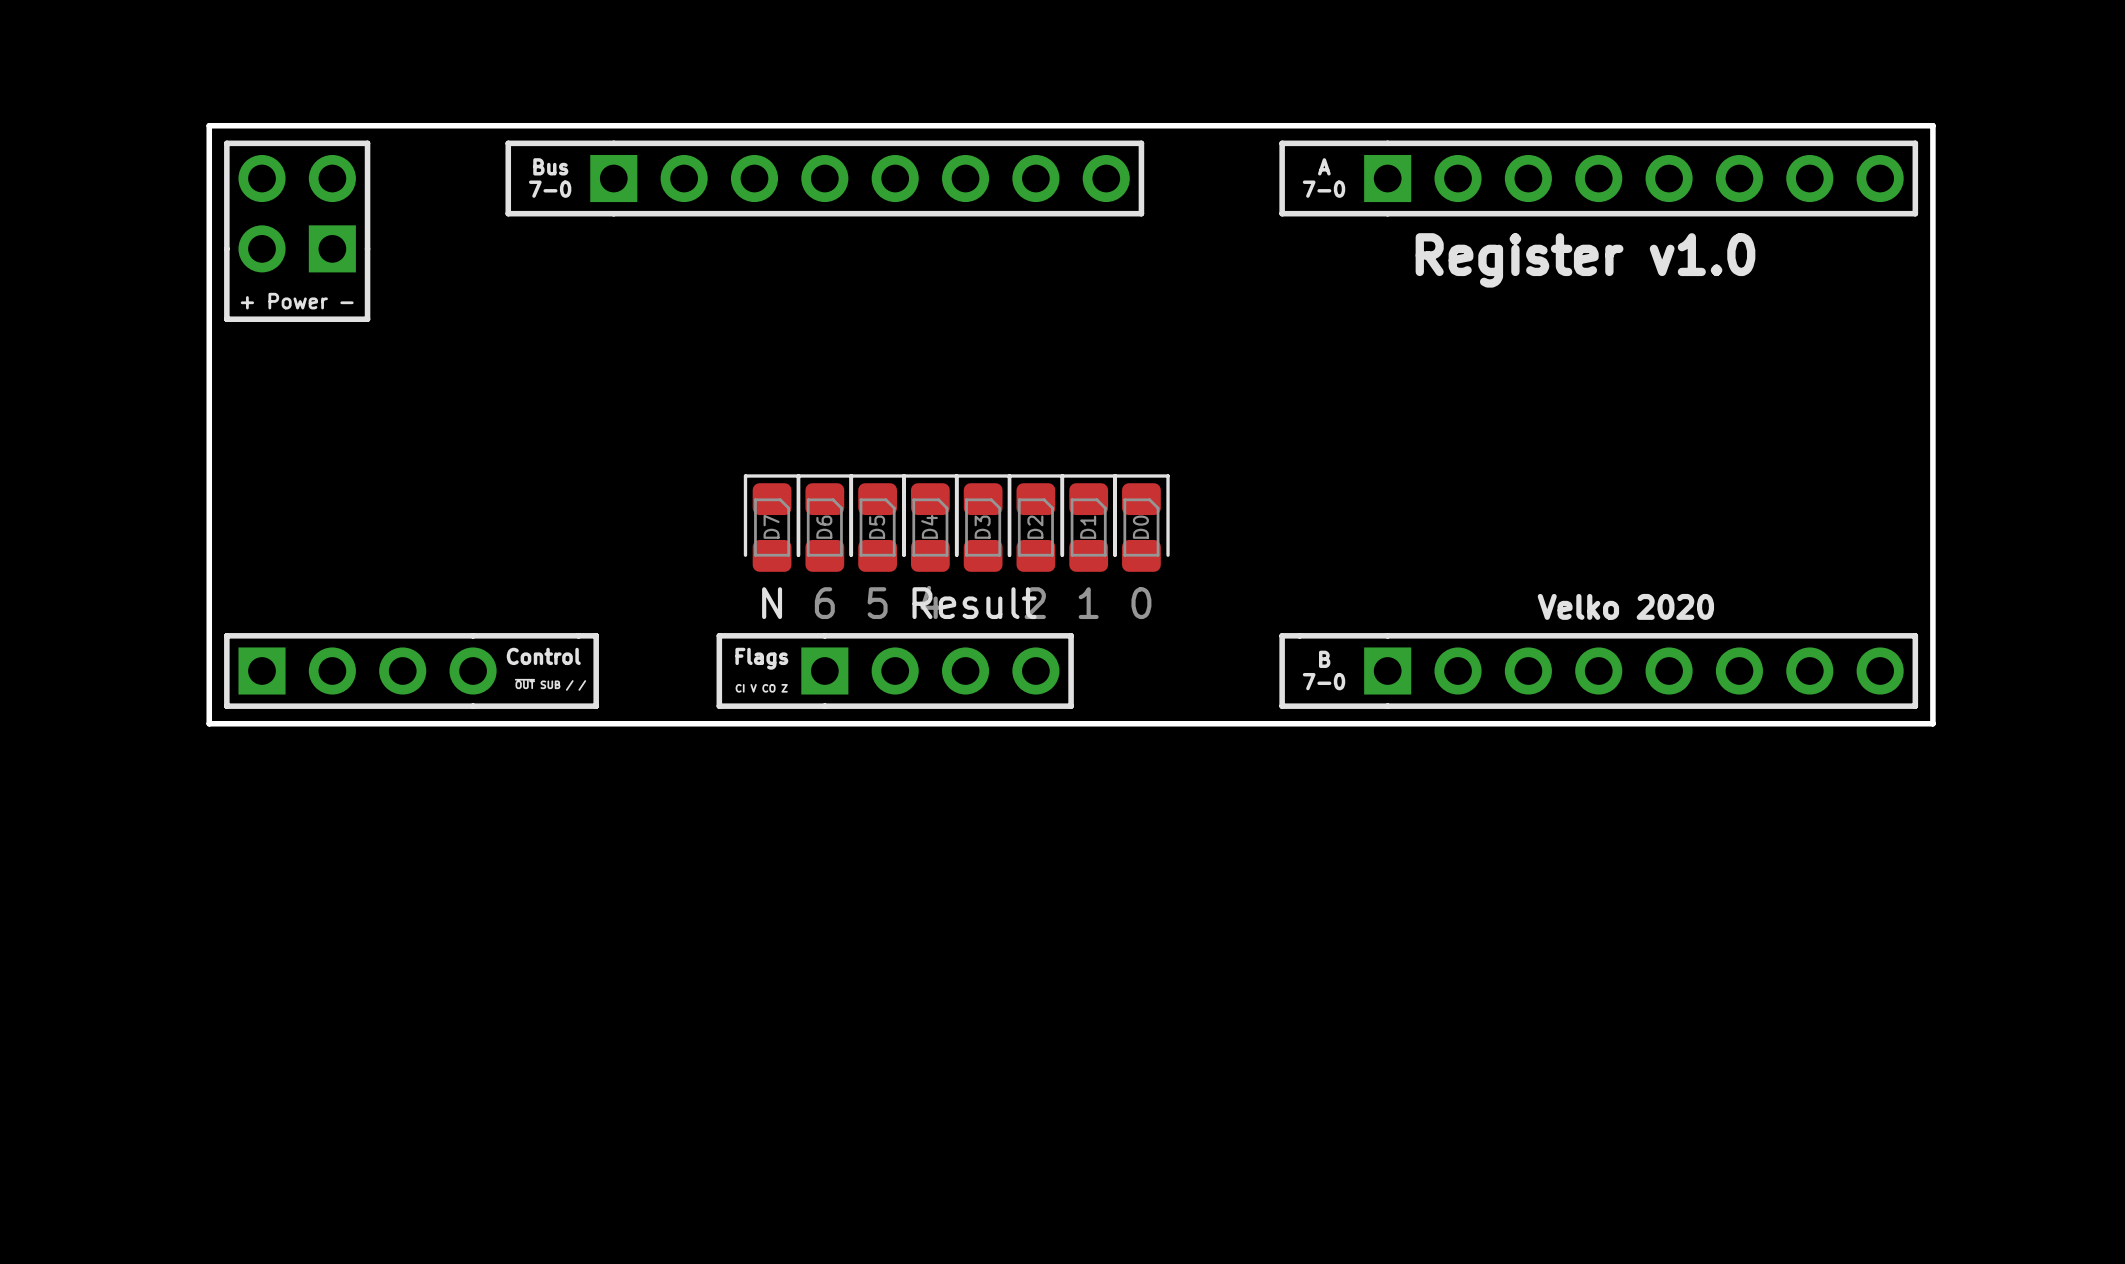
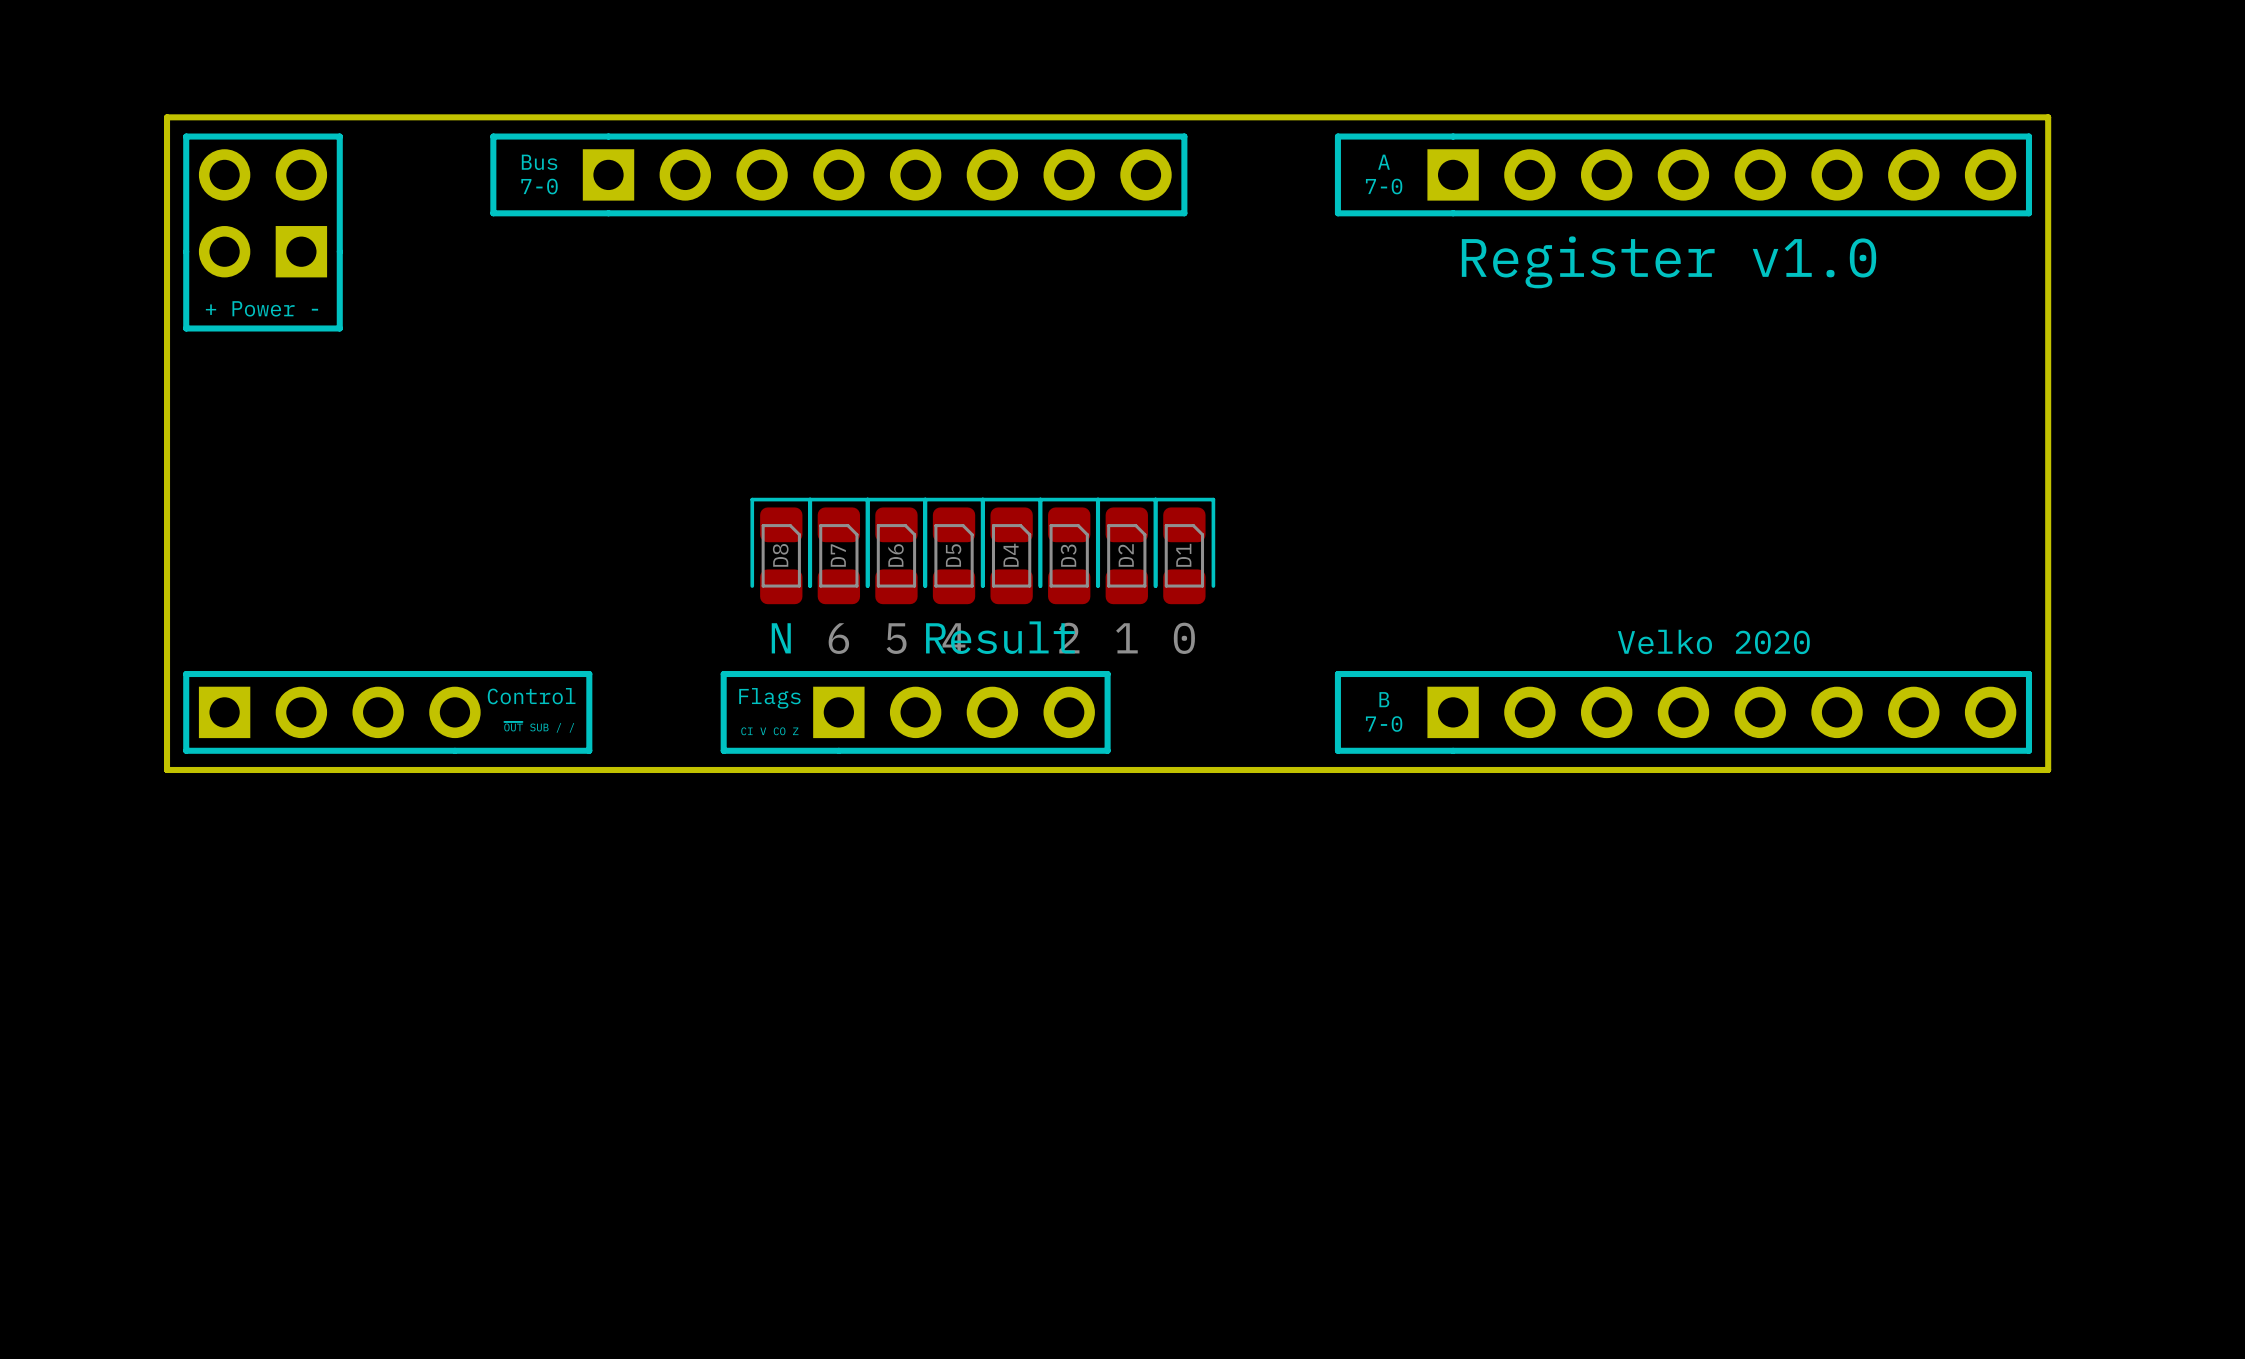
D7 name: D7 (771, 526) -> D8 (780, 555)
D4 name: D4 (929, 526) -> D5 (953, 555)
D6 name: D6 (824, 527) -> D7 (838, 555)
D5 name: D5 (877, 527) -> D6 (896, 555)
D3 name: D3 (982, 527) -> D4 (1011, 555)
D2 name: D2 (1035, 527) -> D3 (1068, 555)
D1 name: D1 (1088, 527) -> D2 (1126, 555)
D0 name: D0 (1140, 527) -> D1 (1183, 555)

